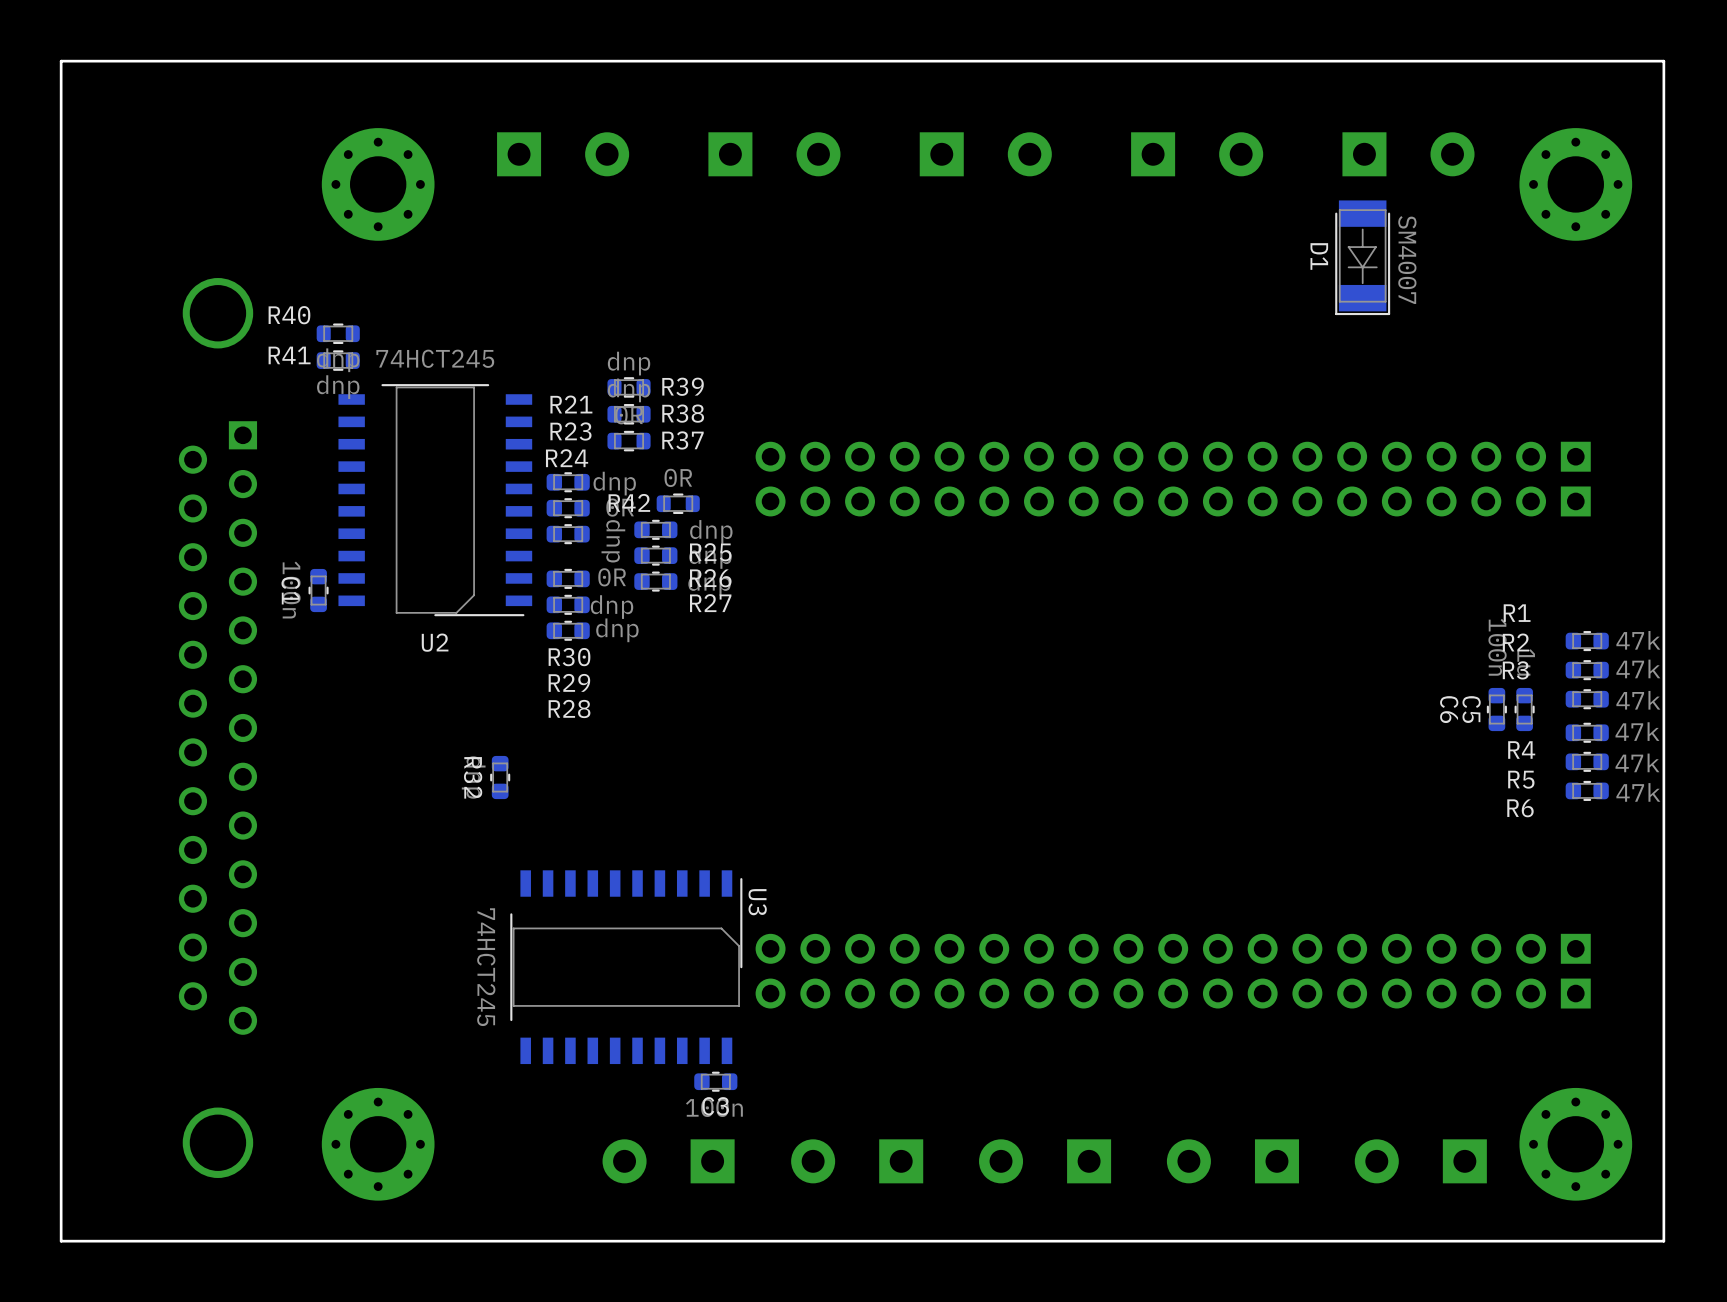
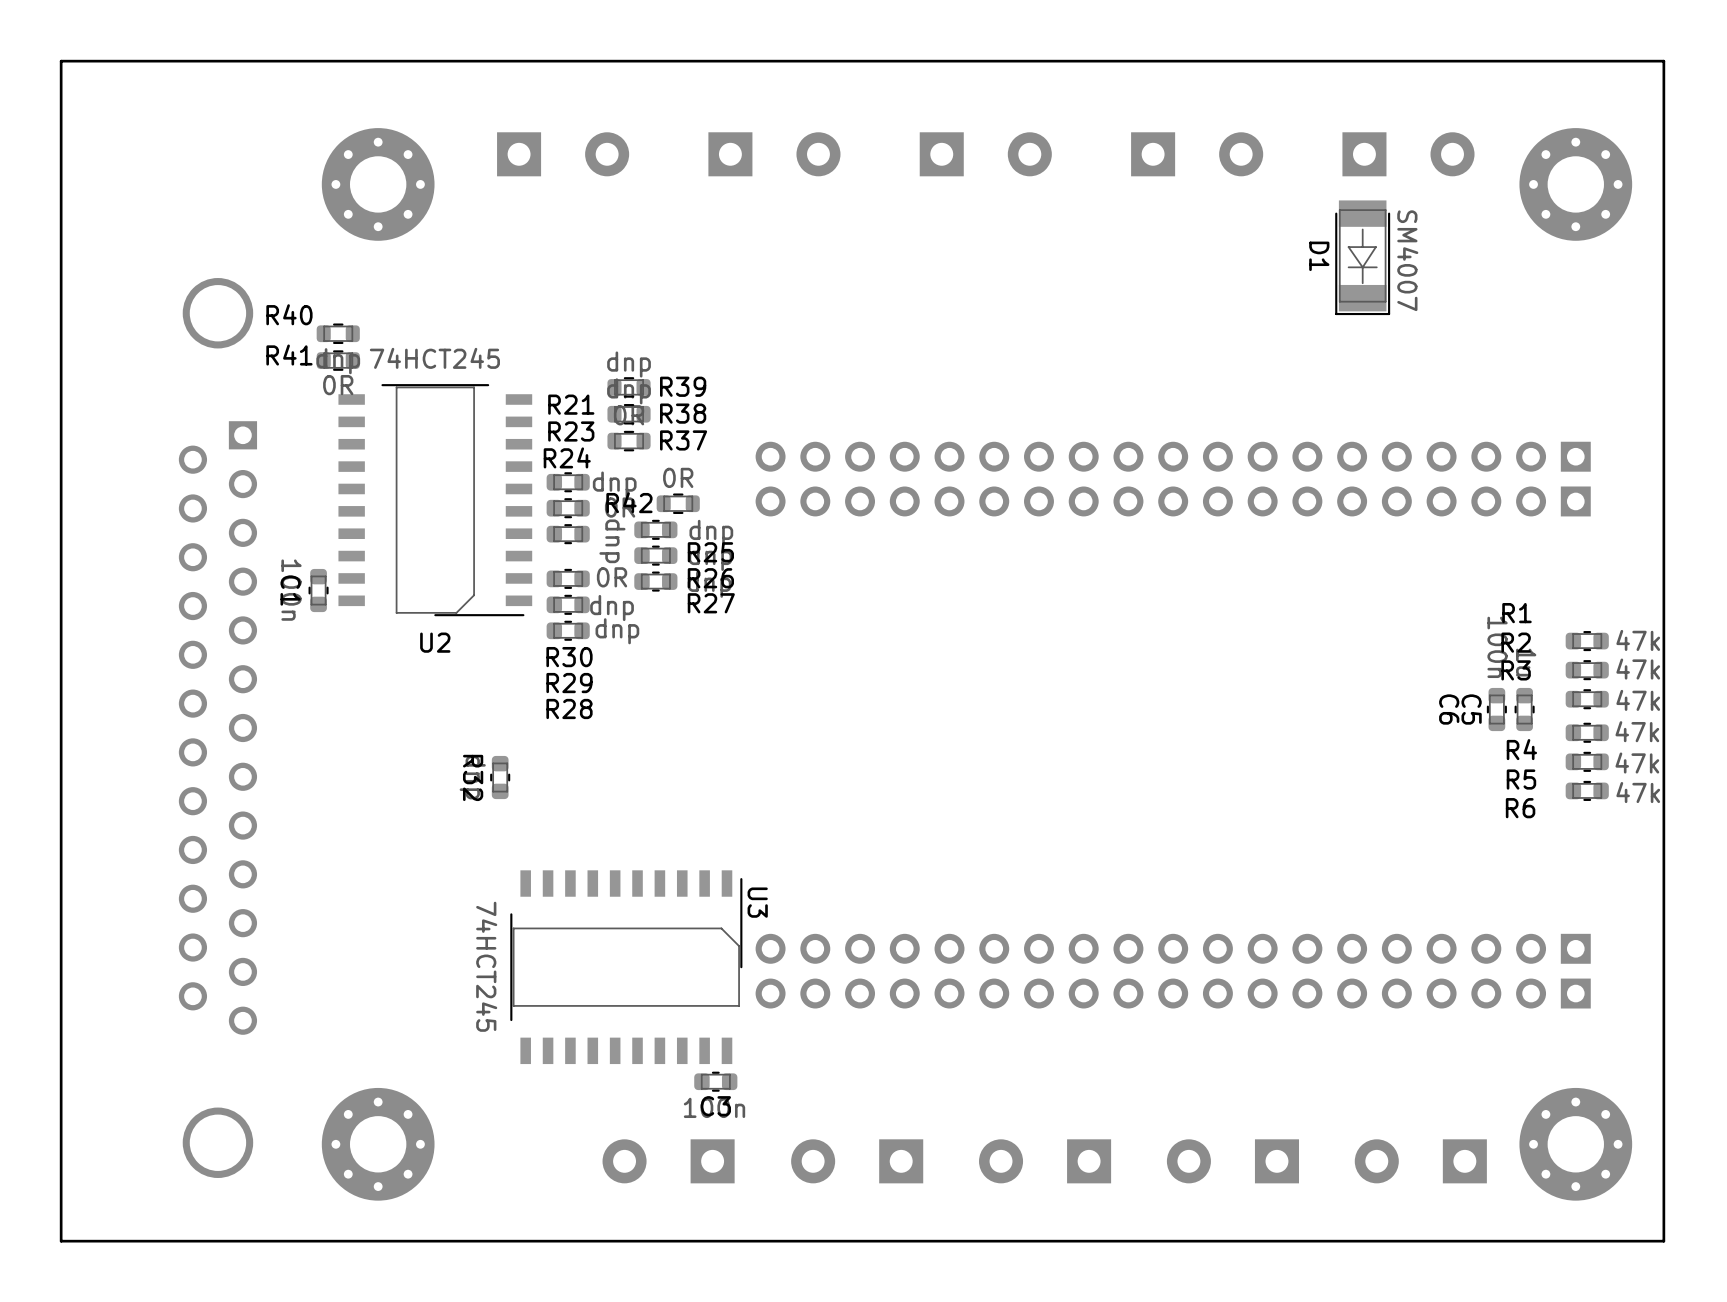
R41 value: dnp (338, 387) -> 0R (338, 385)

